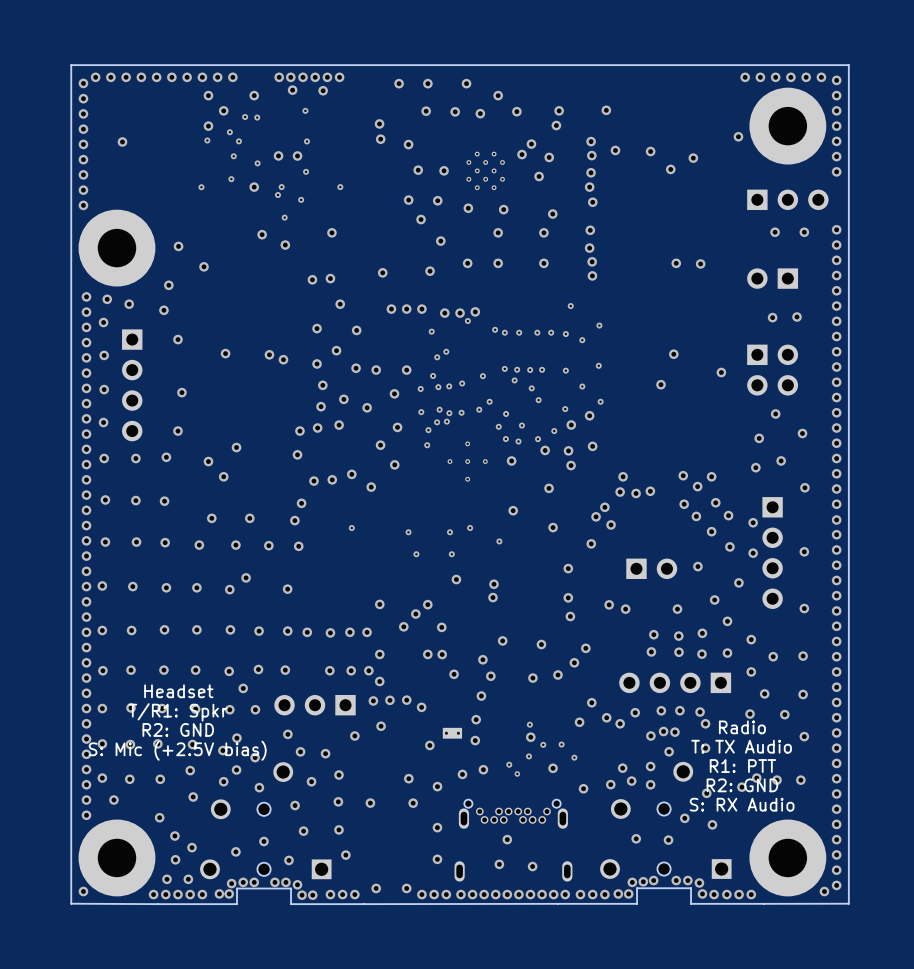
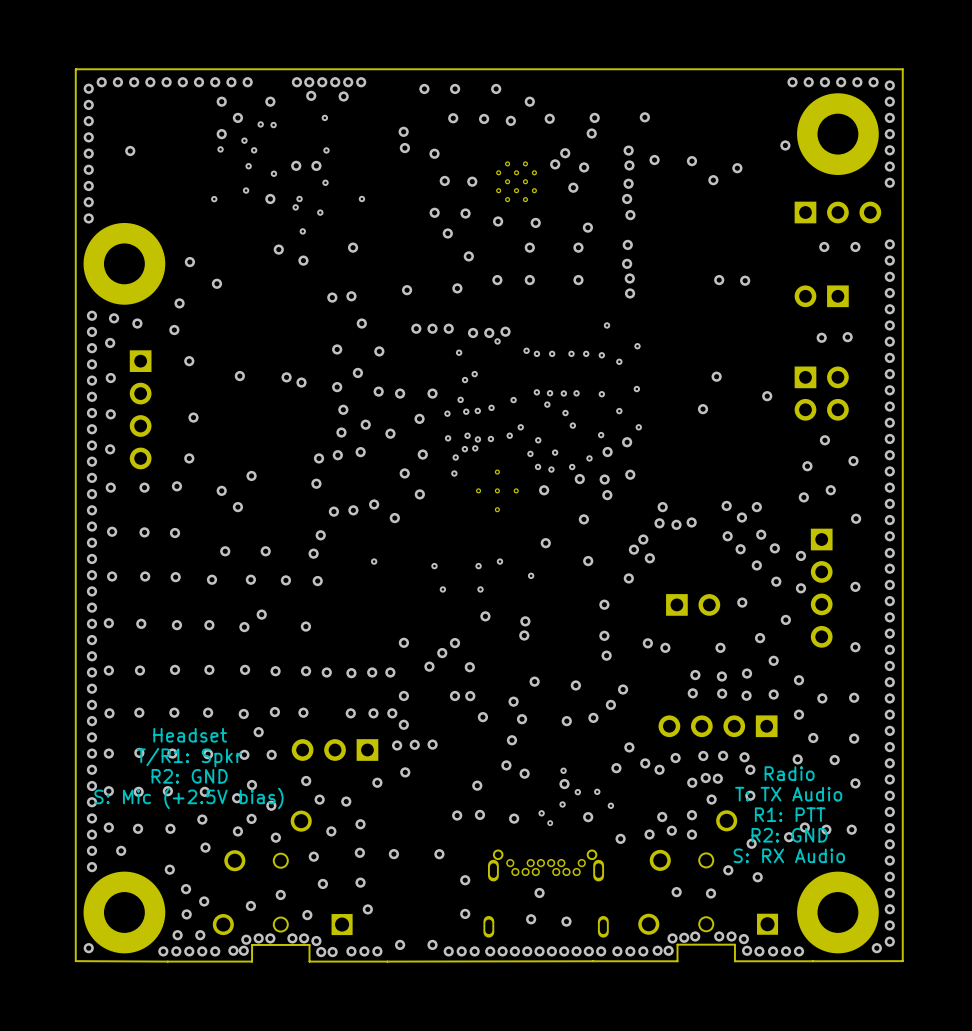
via: (421, 707) -> none
via: none -> (524, 773)
part: (452, 733) -> none
via: none -> (477, 785)
via: (475, 740) -> none
via: (429, 745) -> none
via: none -> (457, 815)
via: none -> (479, 814)
via: (462, 774) -> none
via: (408, 778) -> none
via: (437, 786) -> none

